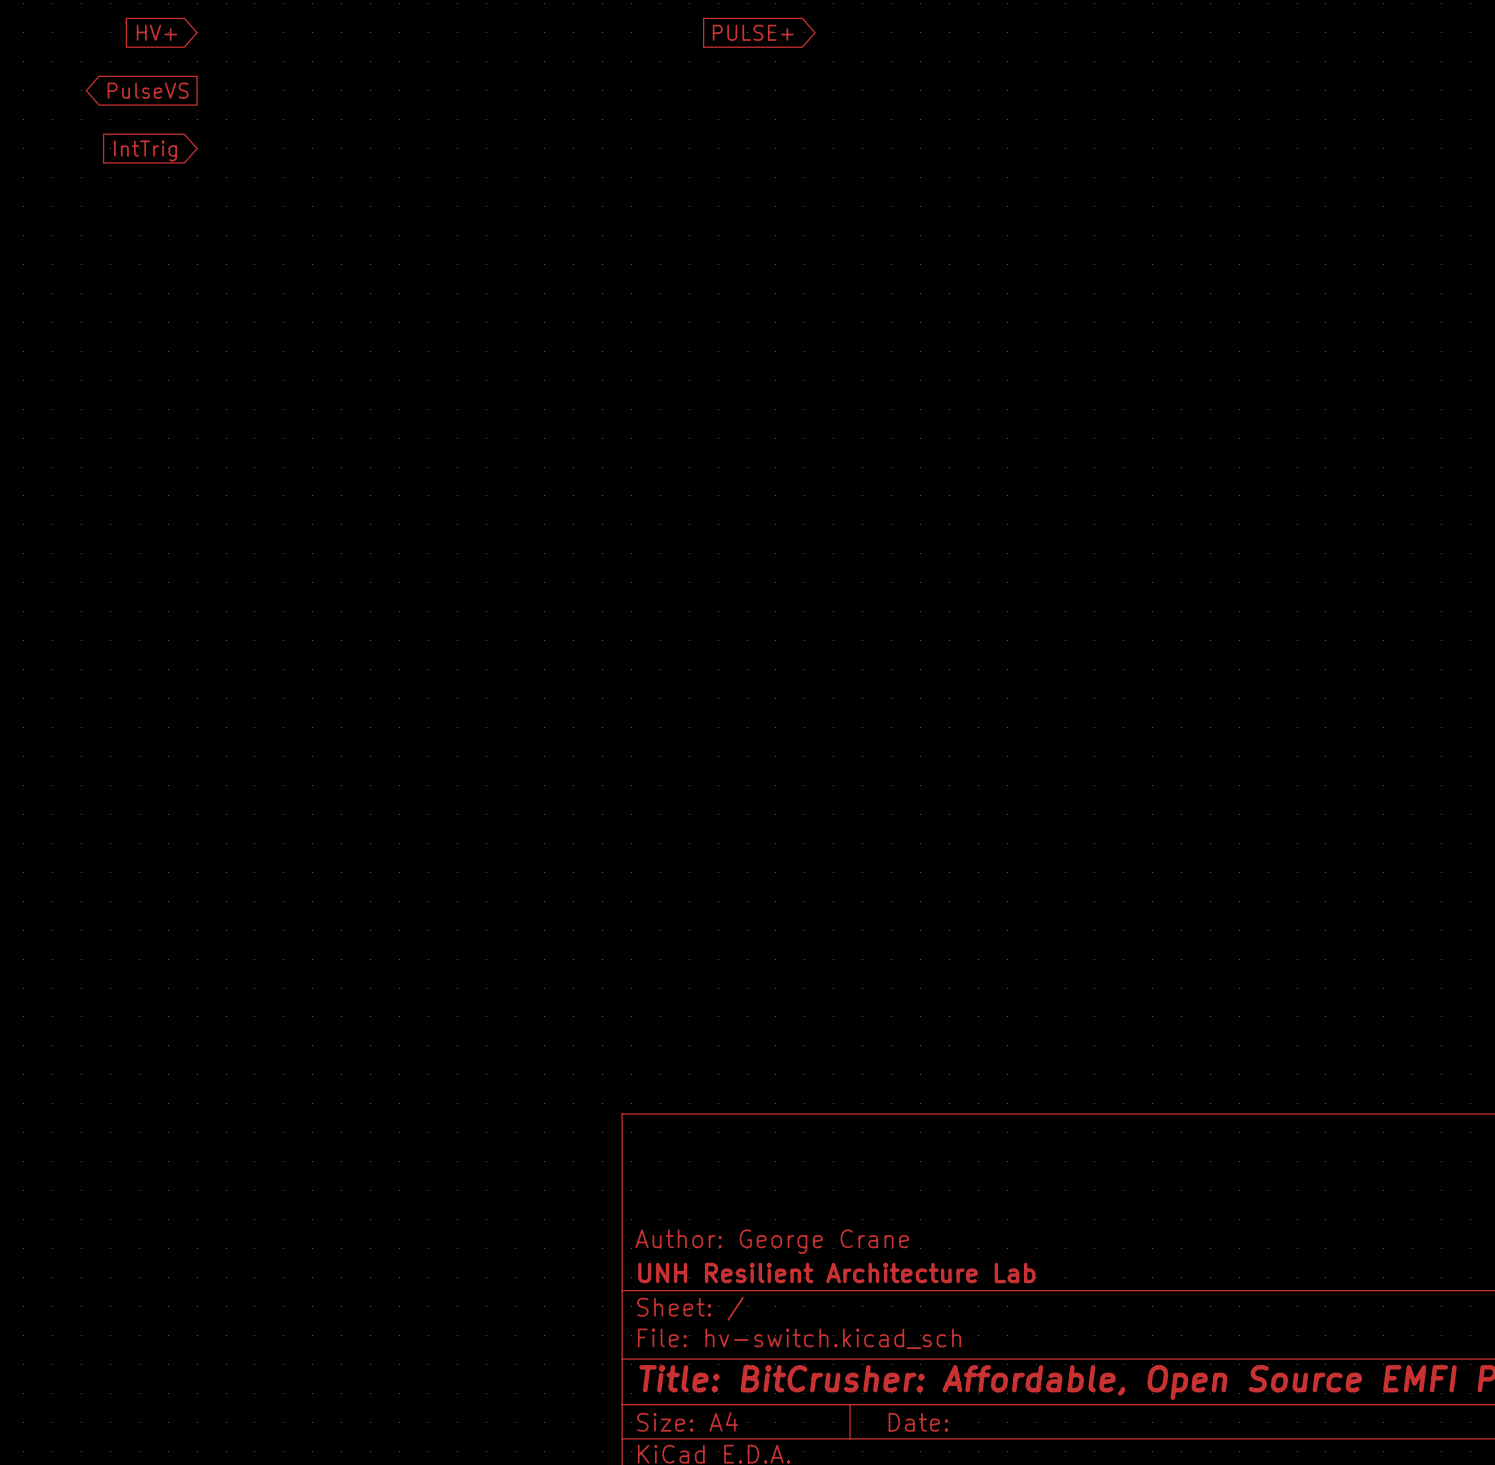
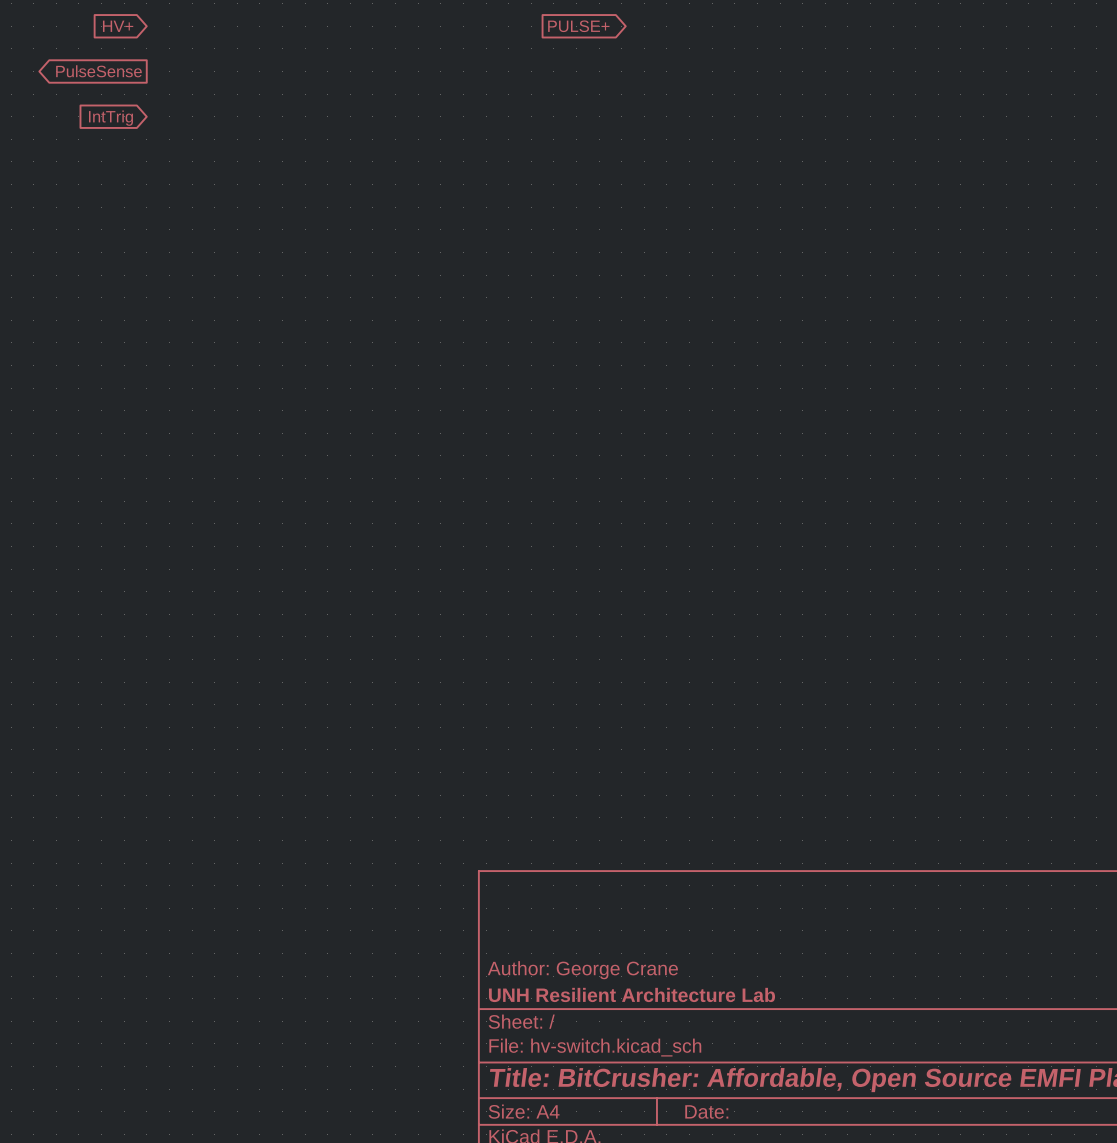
global label: PulseVS (148, 90) -> PulseSense (98, 71)

